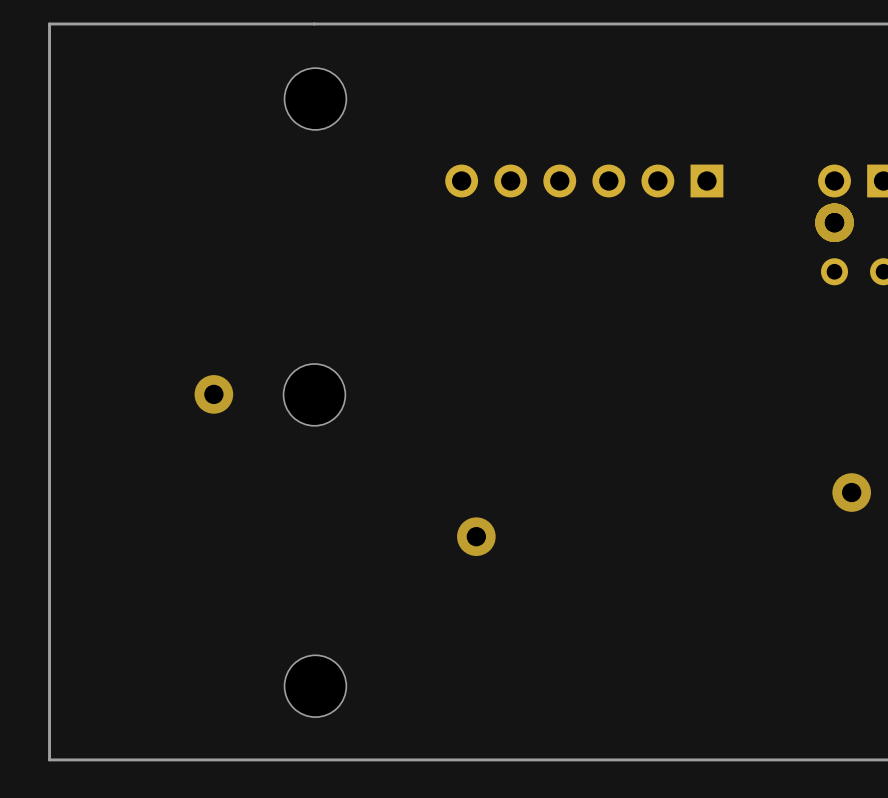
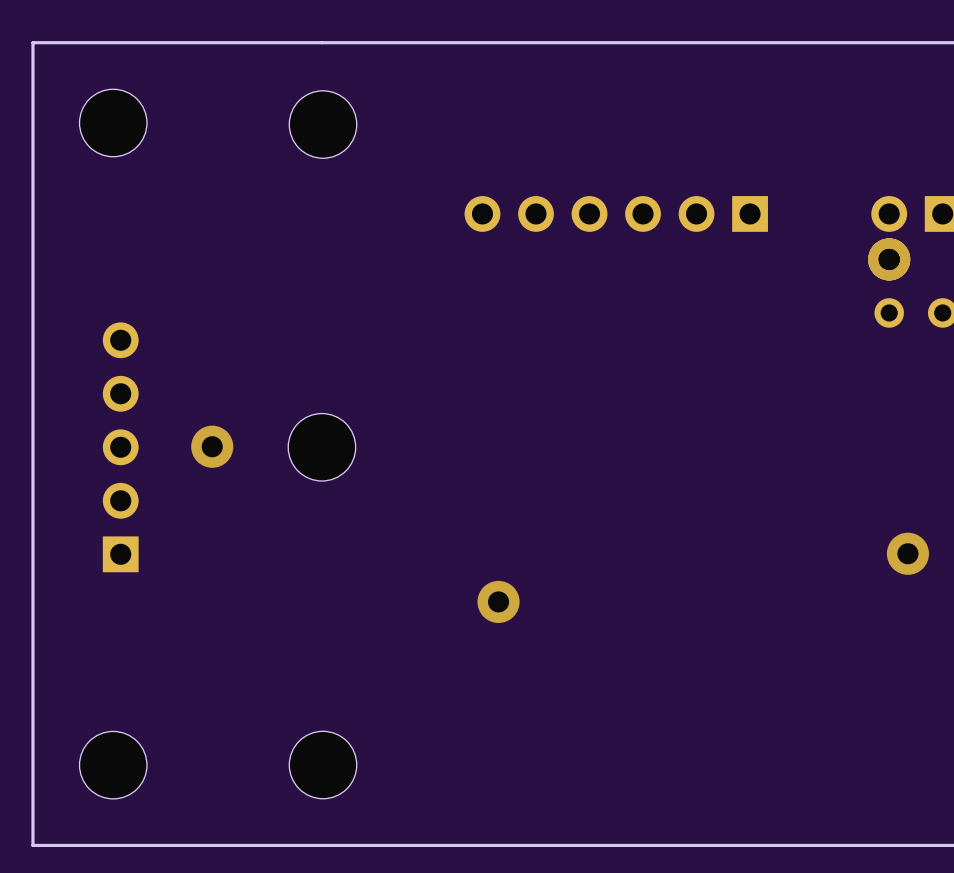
part: none -> (113, 122)
part: none -> (120, 447)
part: none -> (113, 765)

